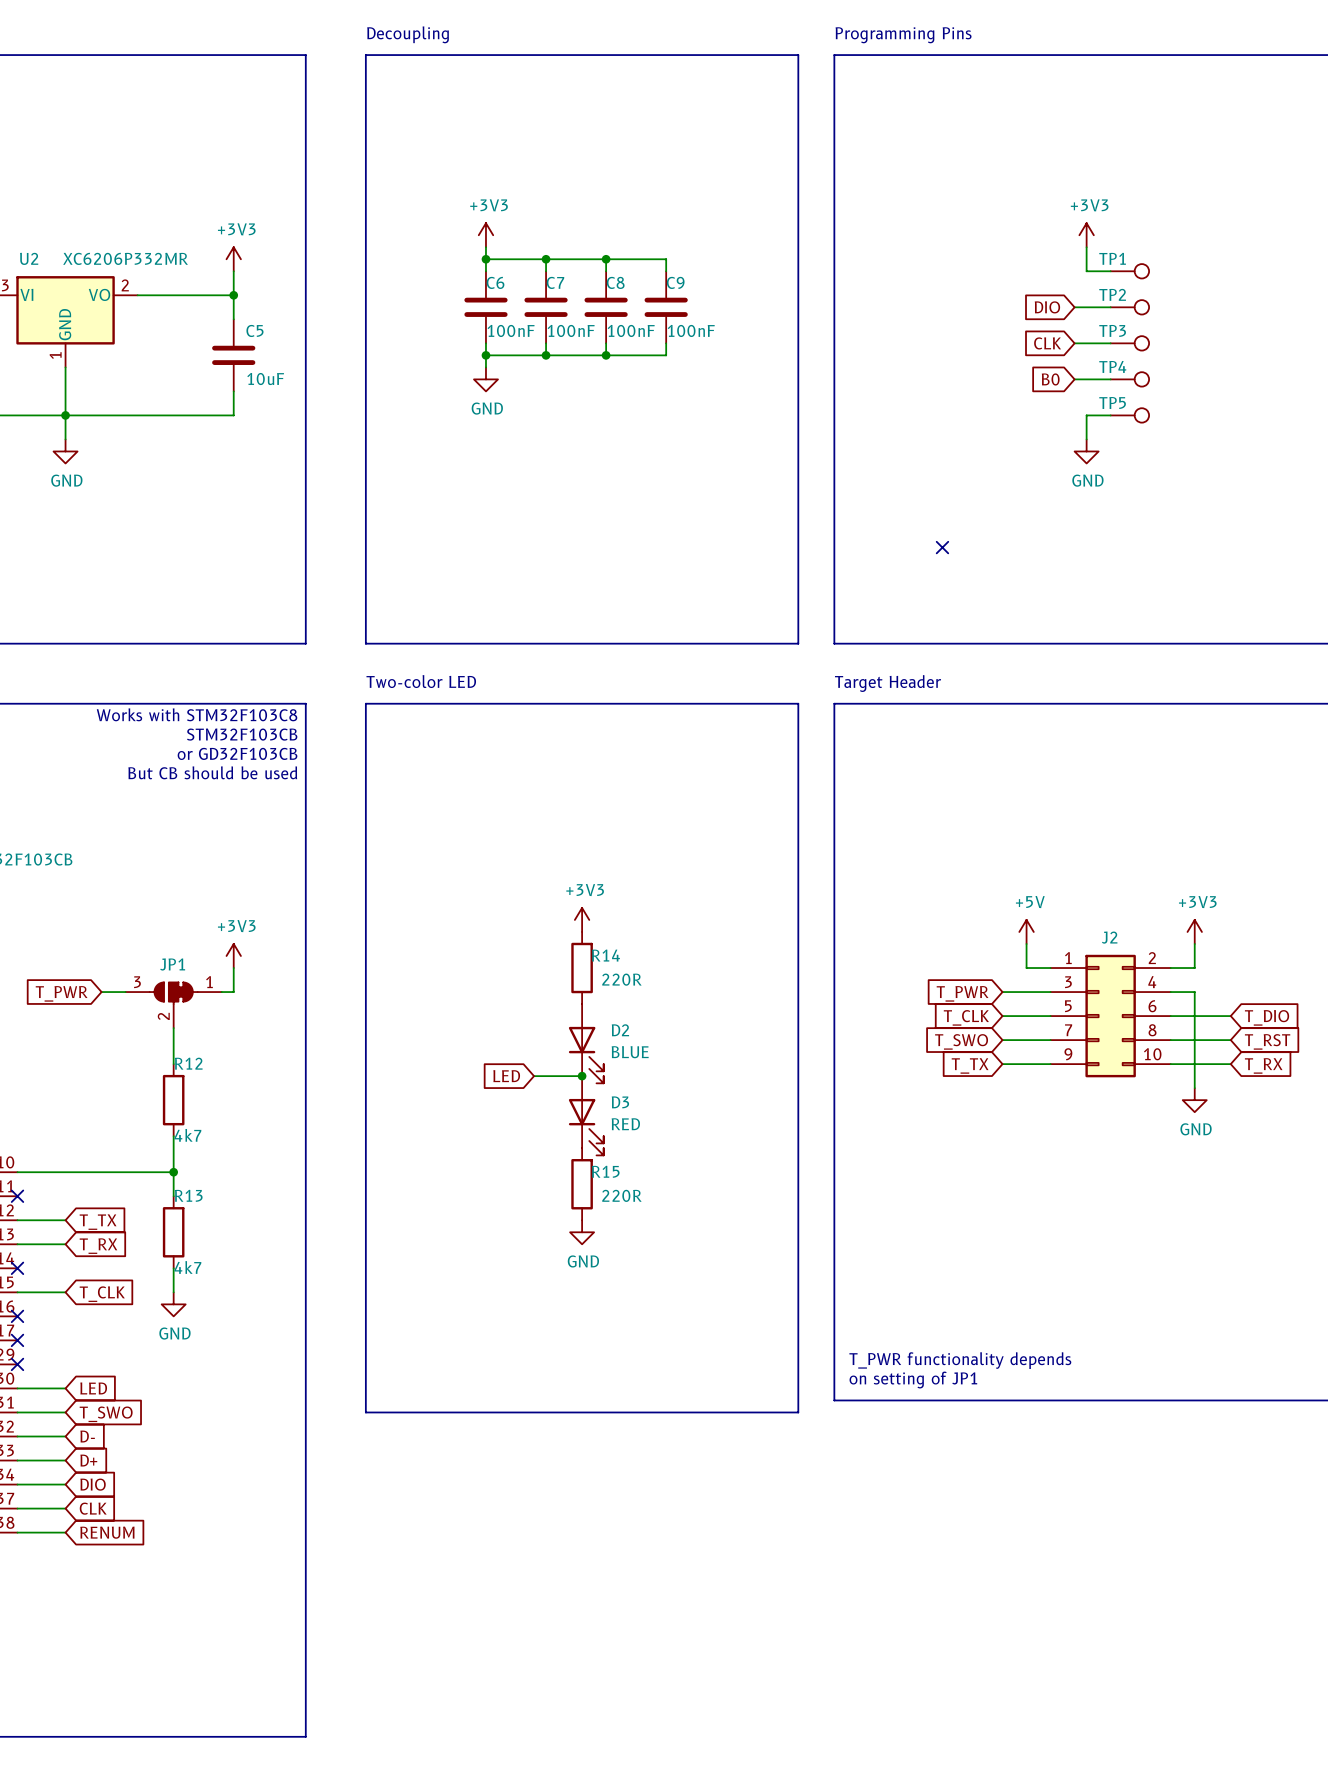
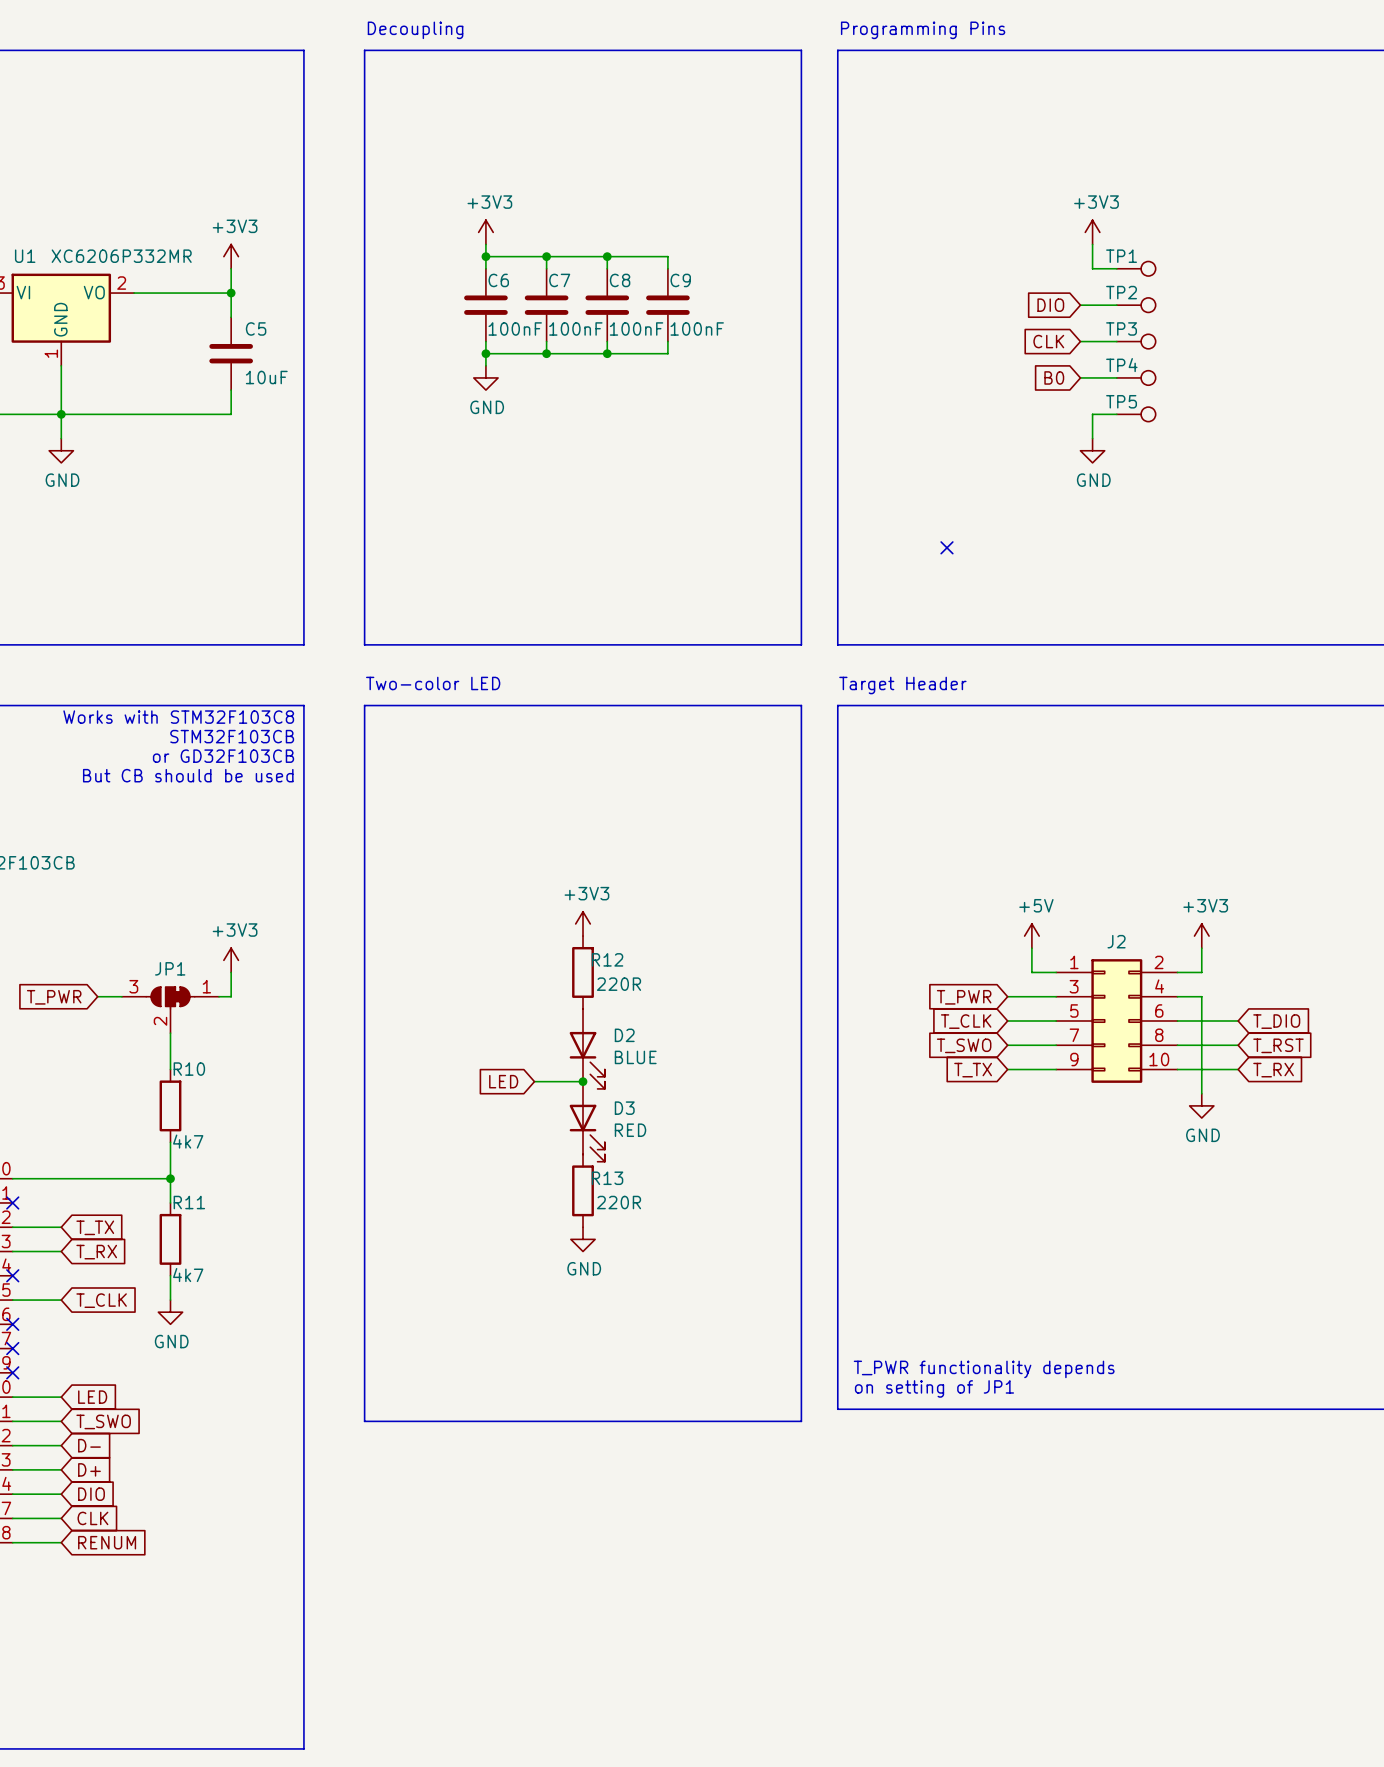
U2 name: U2 (29, 258) -> U1 (25, 256)
R14 name: R14 (605, 955) -> R12 (607, 959)
R12 name: R12 (188, 1063) -> R10 (189, 1069)
R15 name: R15 (605, 1171) -> R13 (607, 1178)
R13 name: R13 (188, 1195) -> R11 (189, 1202)

